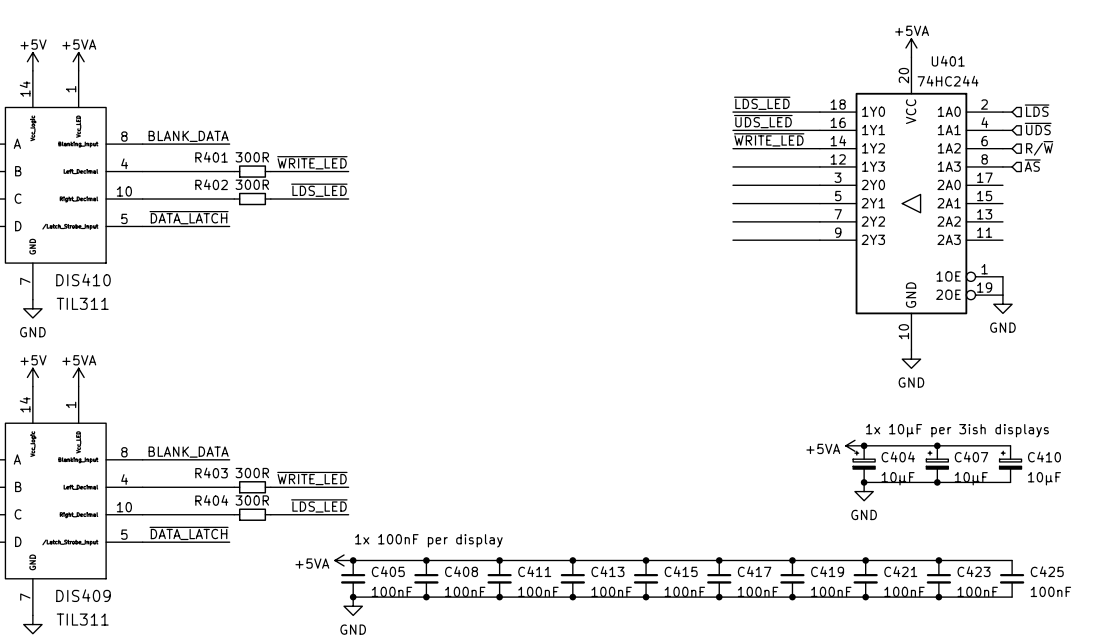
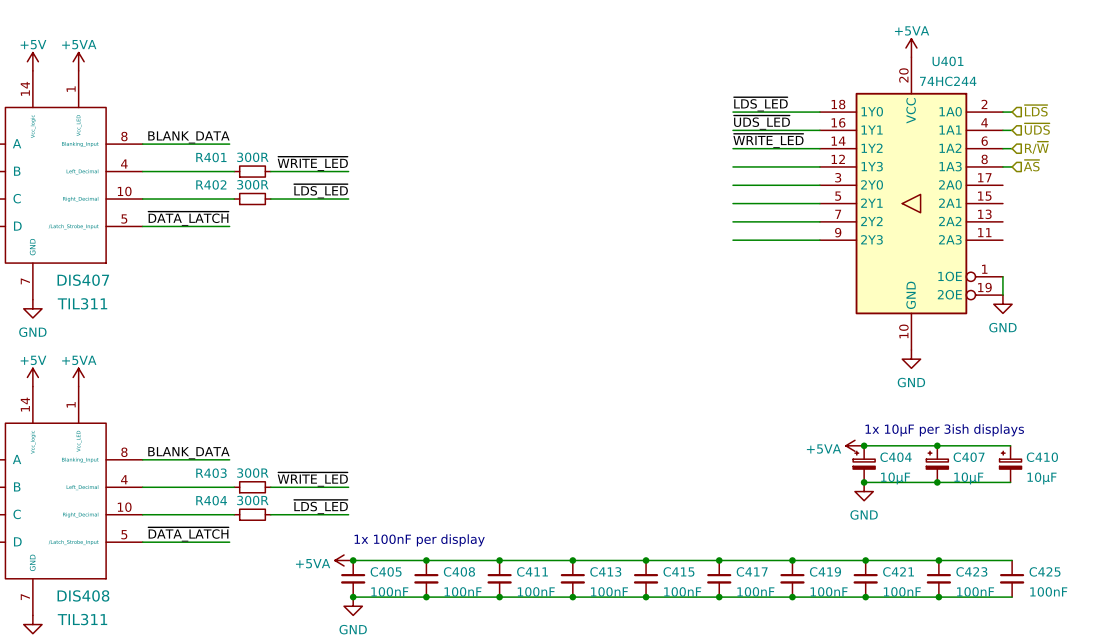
DIS410 name: DIS410 (83, 279) -> DIS407 (83, 280)
DIS409 name: DIS409 (83, 595) -> DIS408 (83, 595)

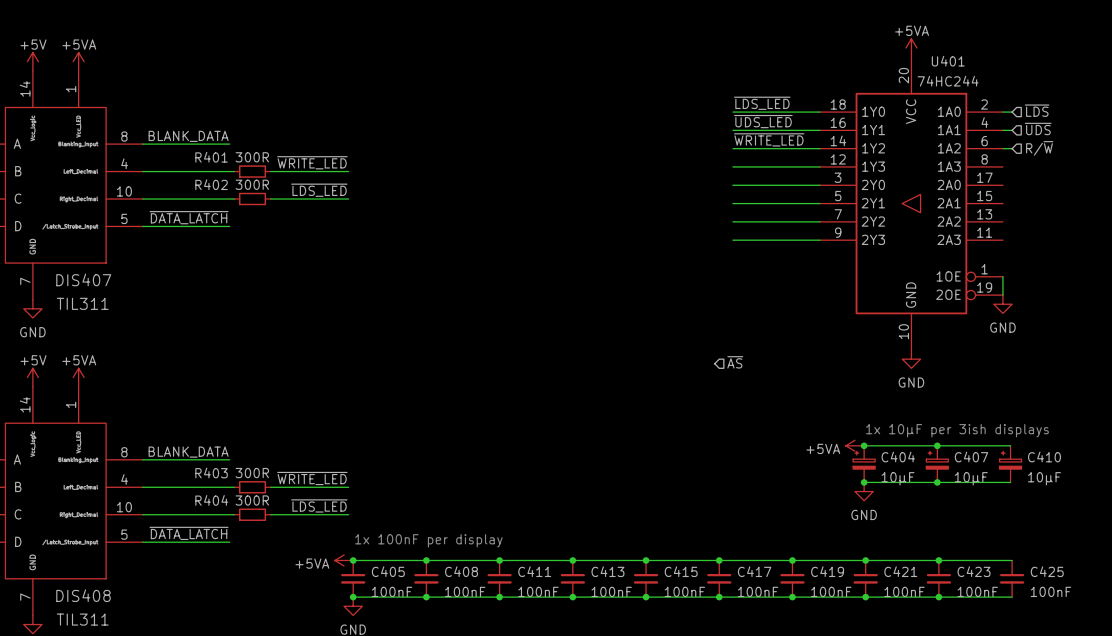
hierarchical label: ~{AS} (1031, 165) -> none
wire: (1002, 166) (1012, 166) -> none
hierarchical label: none -> ~{AS} (735, 362)

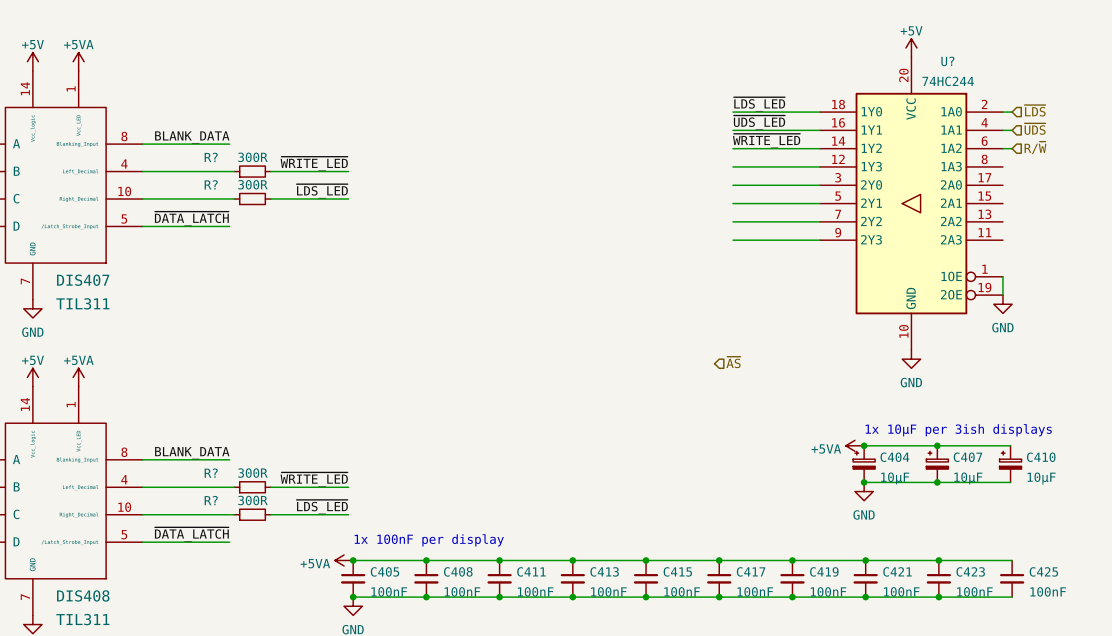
power symbol: +5VA (911, 48) -> +5V (911, 48)
U401 name: U401 (948, 61) -> U? (947, 61)
R401 name: R401 (211, 157) -> R? (211, 157)
R402 name: R402 (211, 184) -> R? (211, 184)
R403 name: R403 (211, 472) -> R? (211, 473)
R404 name: R404 (211, 500) -> R? (211, 500)

